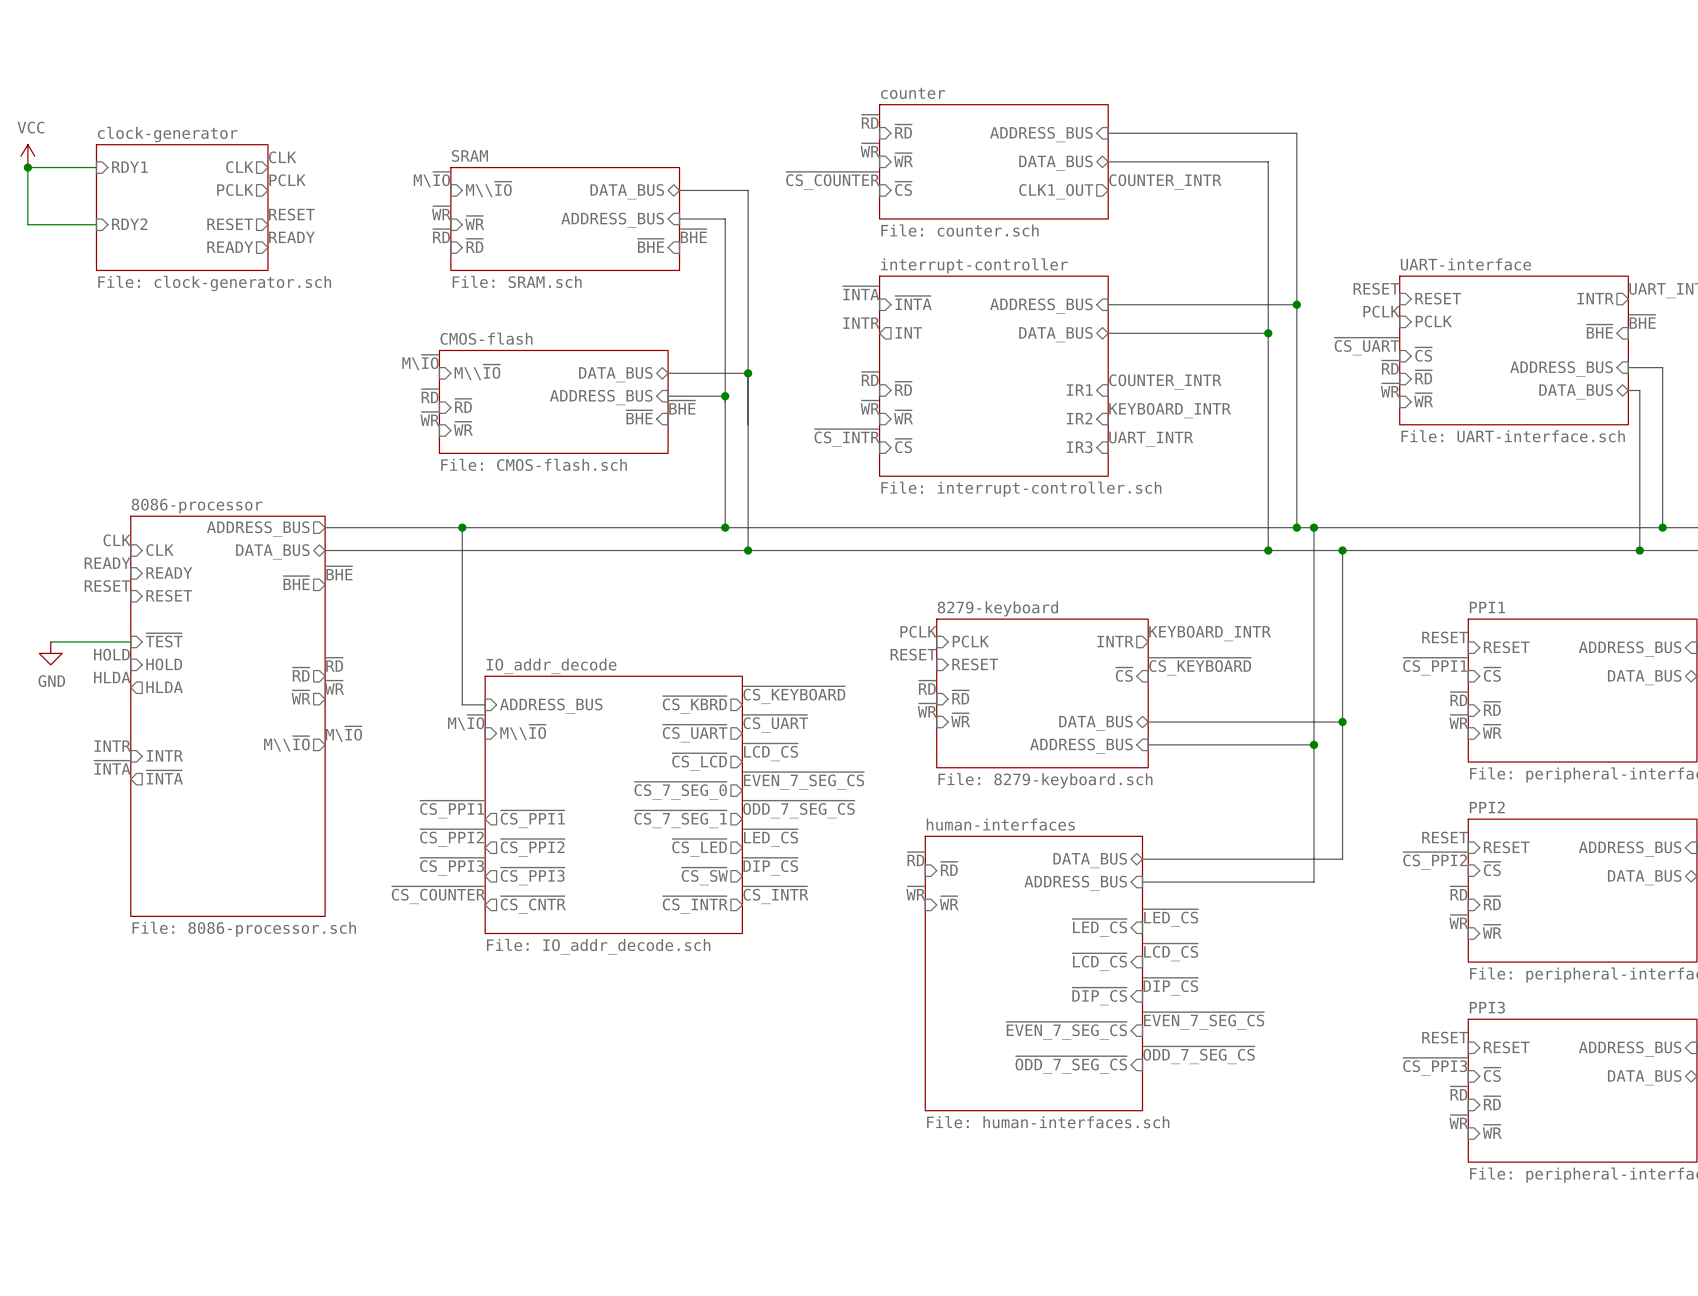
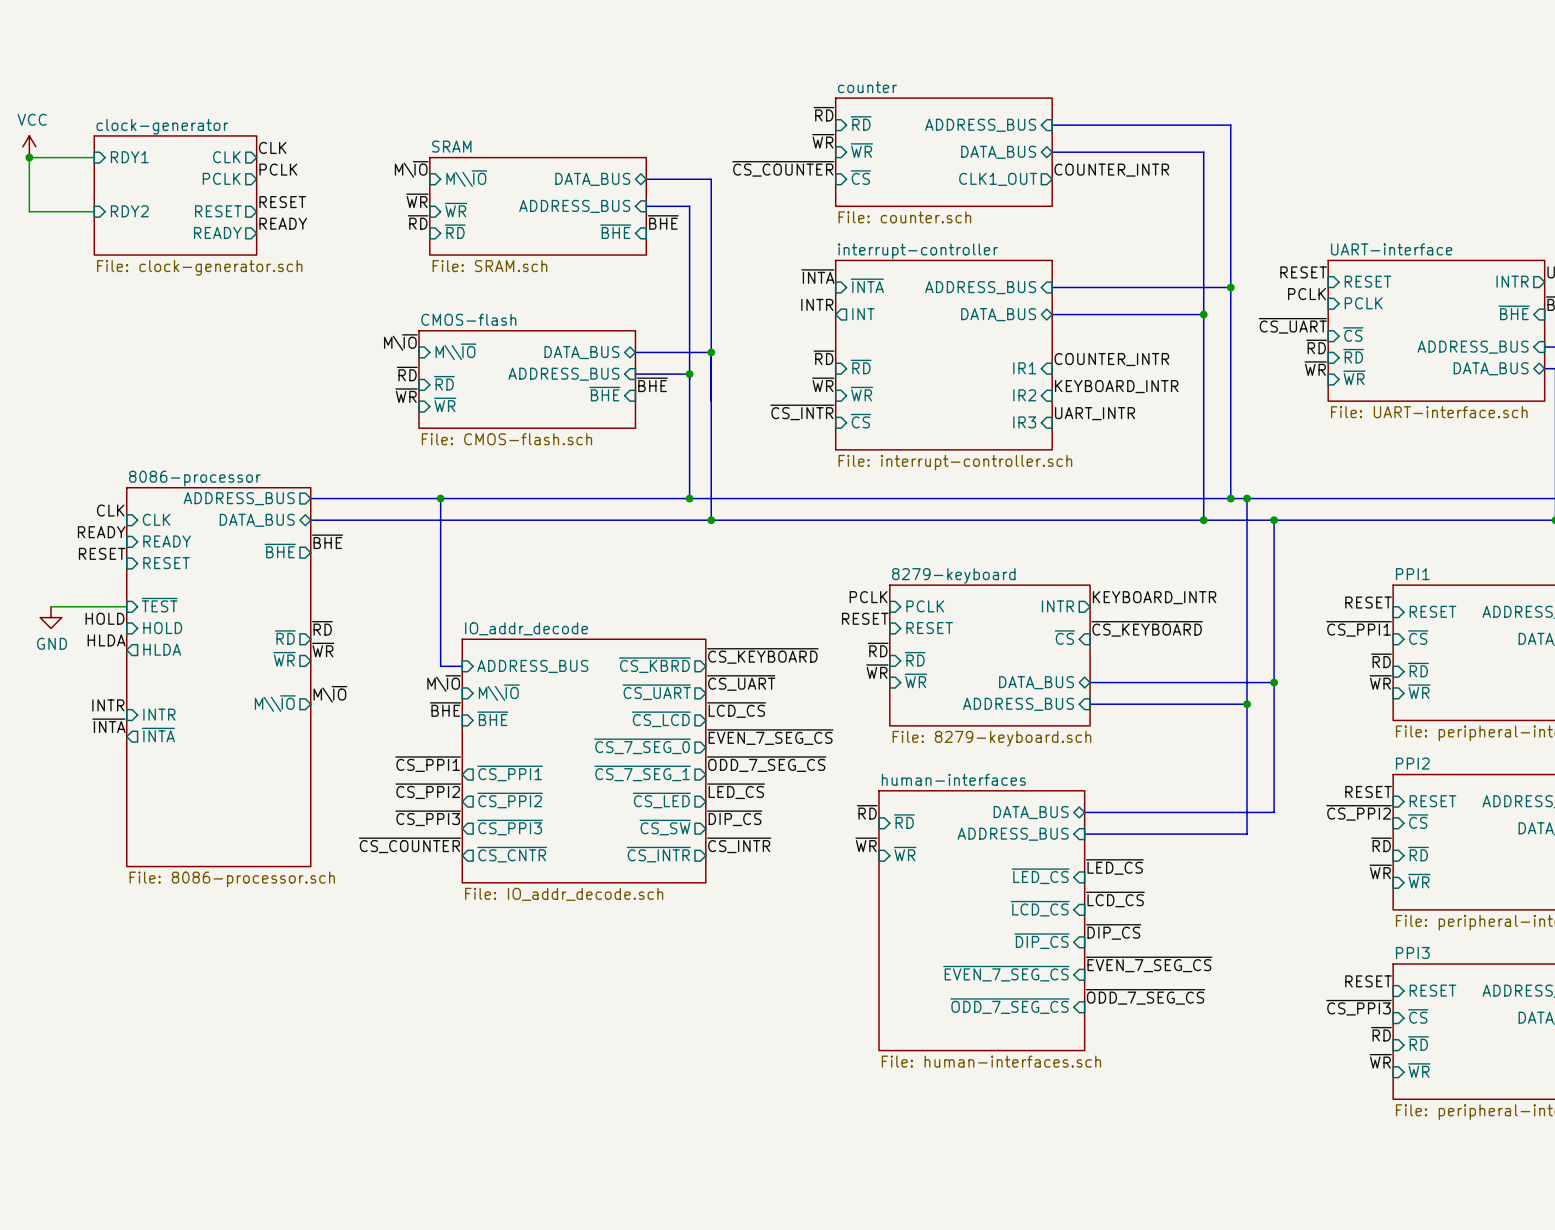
label: none -> ~{BHE} (445, 709)
sheet pin: none -> ~{BHE} (492, 718)

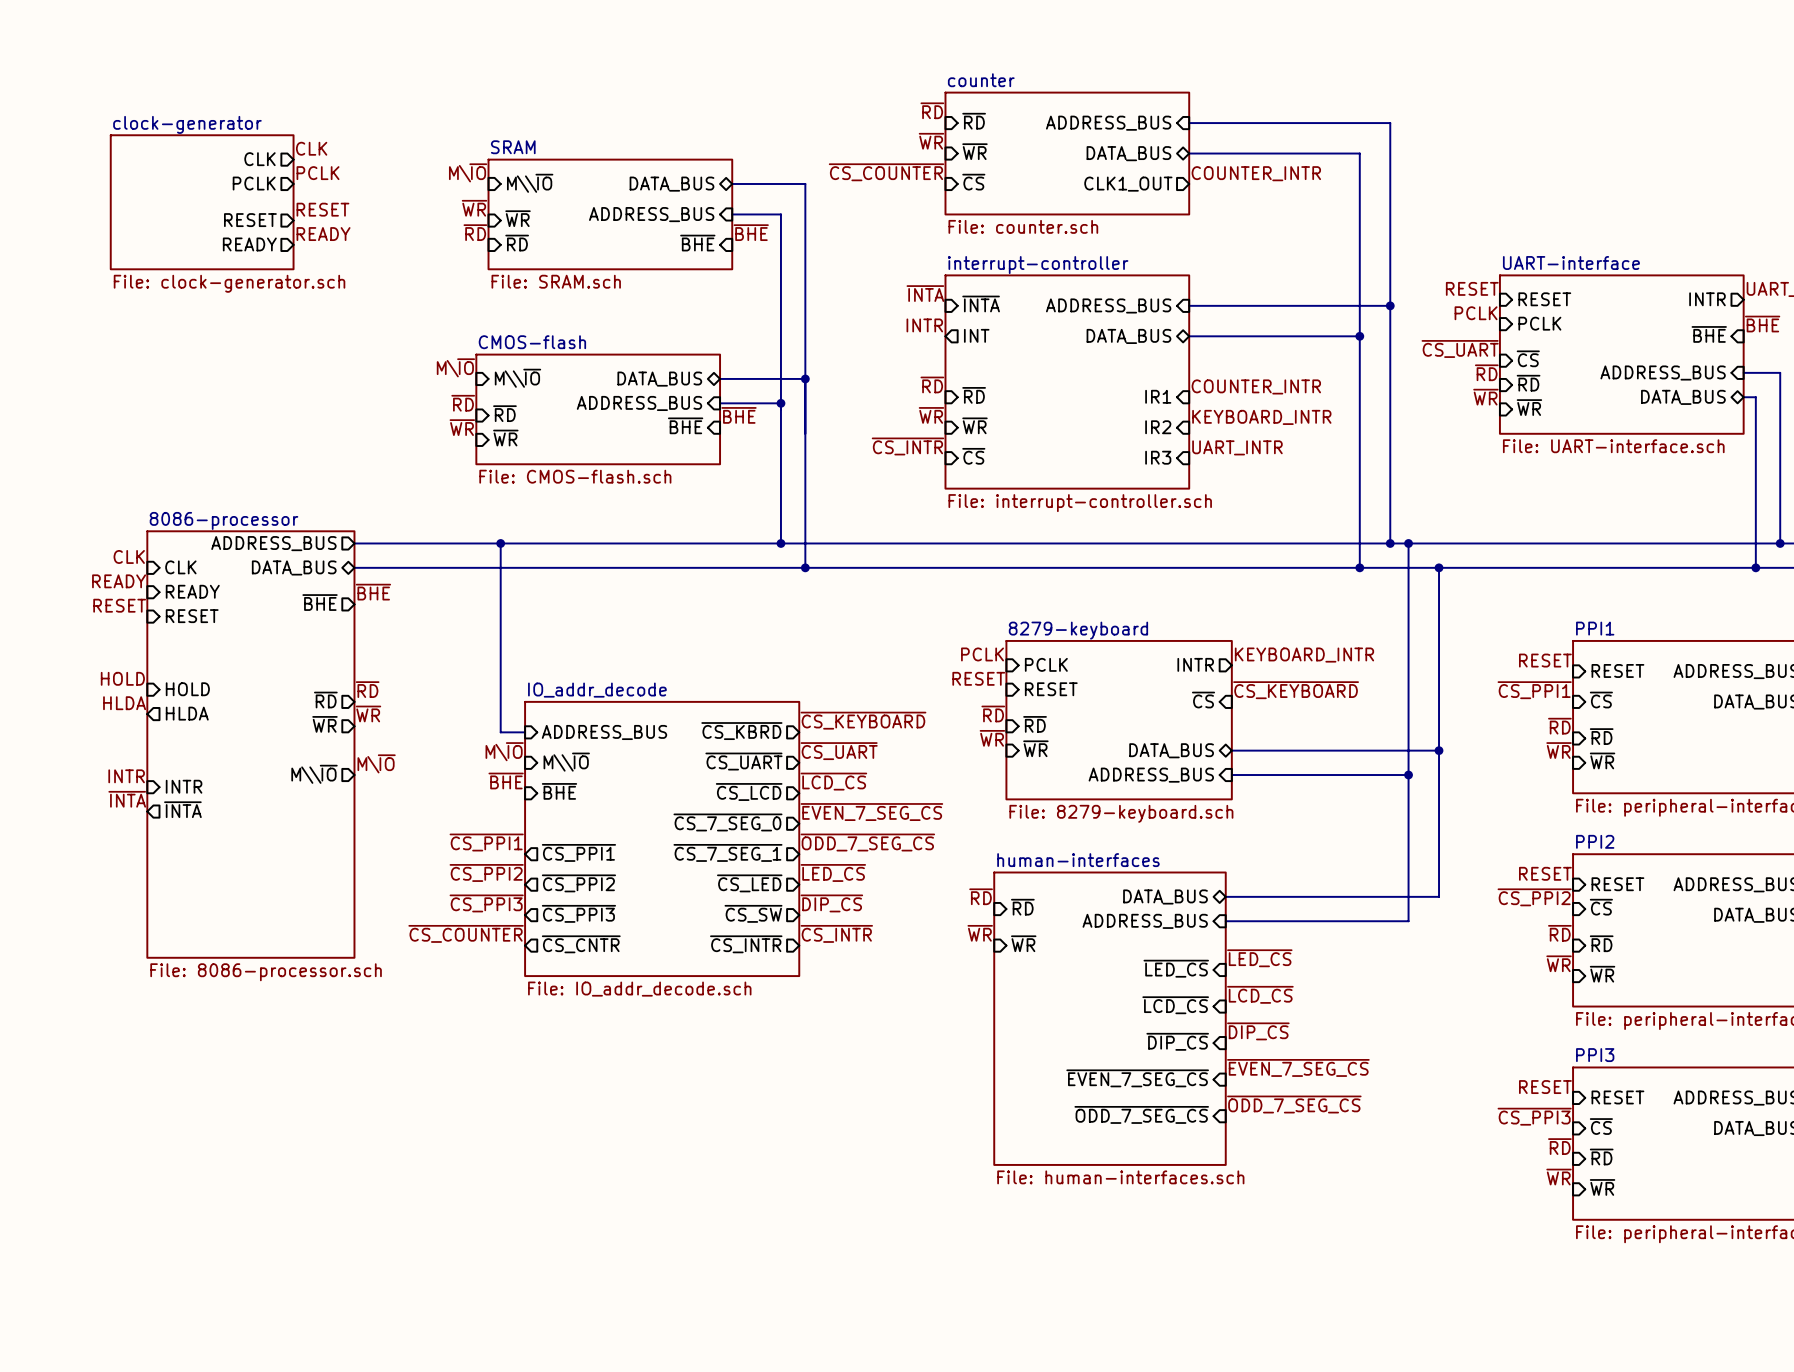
power symbol: VCC (29, 146) -> none
junction: (29, 157) -> none
wire: (94, 157) (29, 157) (29, 211) (94, 211) -> none
sheet pin: RDY1 (129, 157) -> none
sheet pin: RDY2 (129, 211) -> none
sheet pin: ~{TEST} (159, 605) -> none
wire: (50, 606) (126, 606) -> none
power symbol: GND (50, 617) -> none

